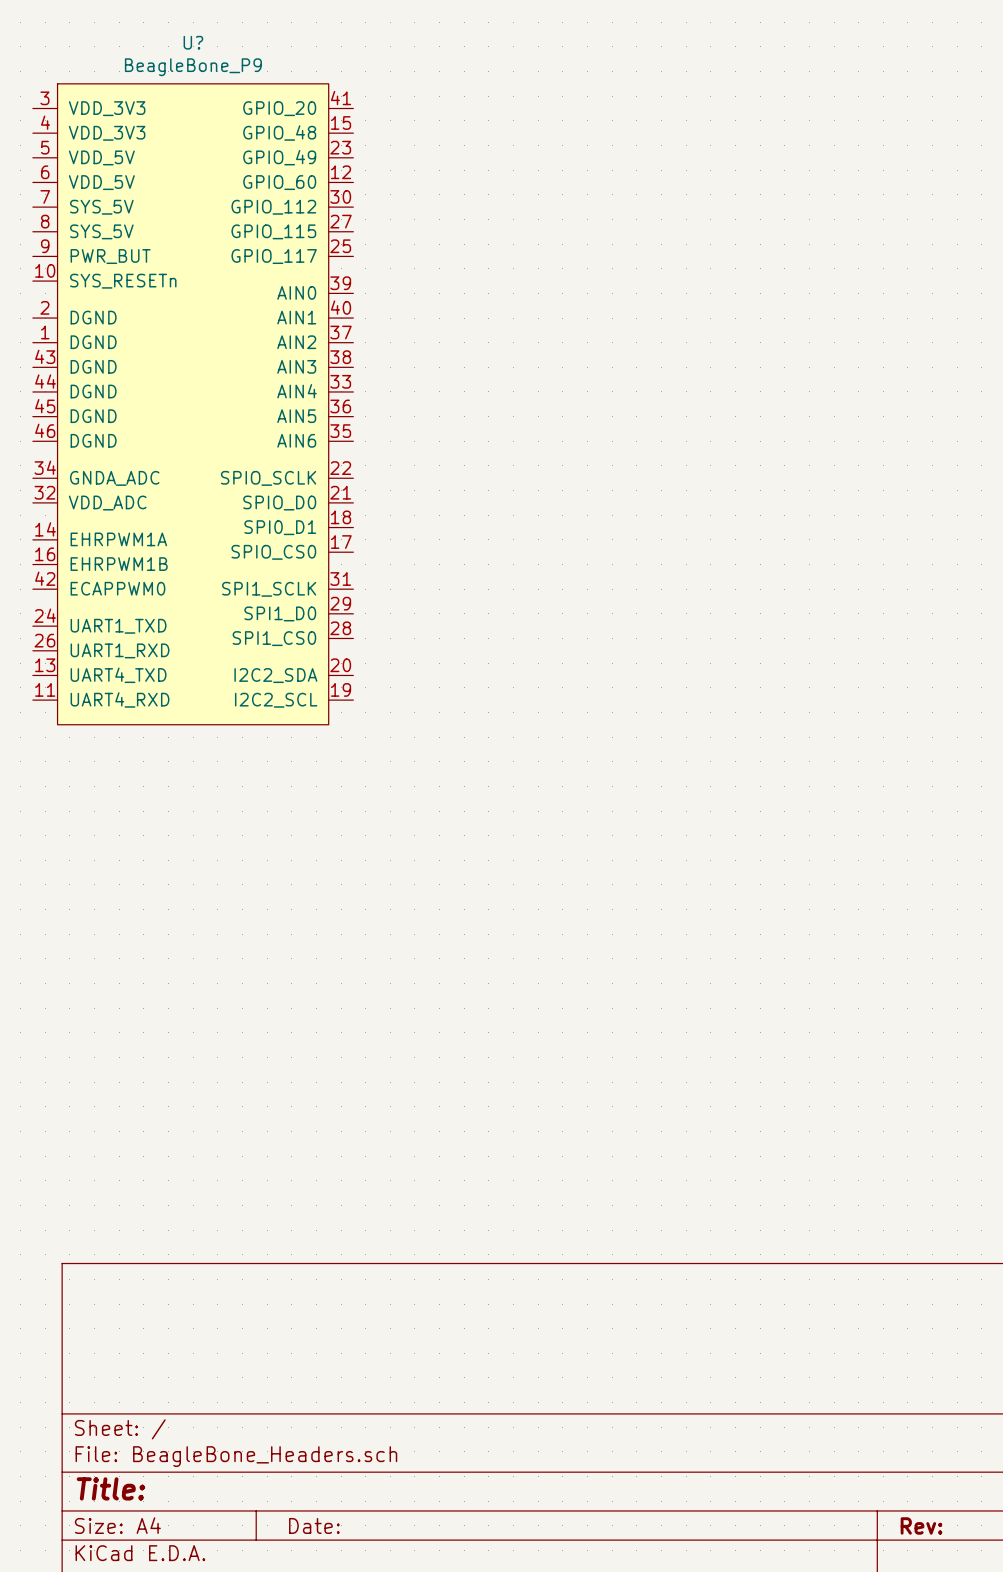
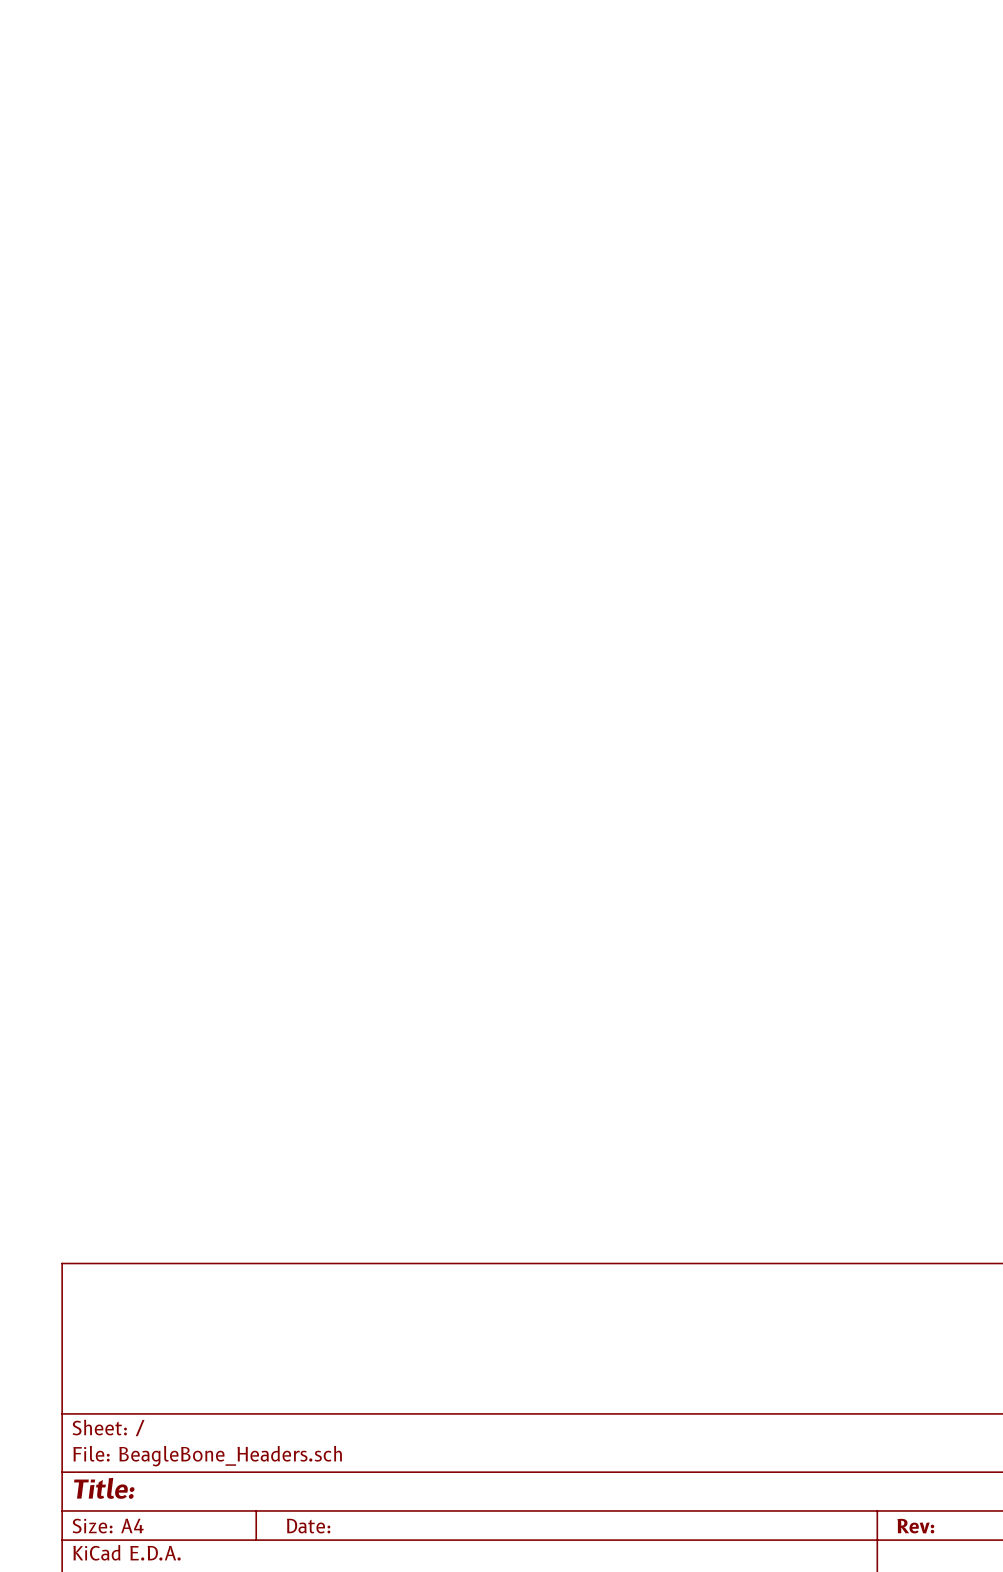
U?: BeagleBone_P9 (193, 404) -> none

